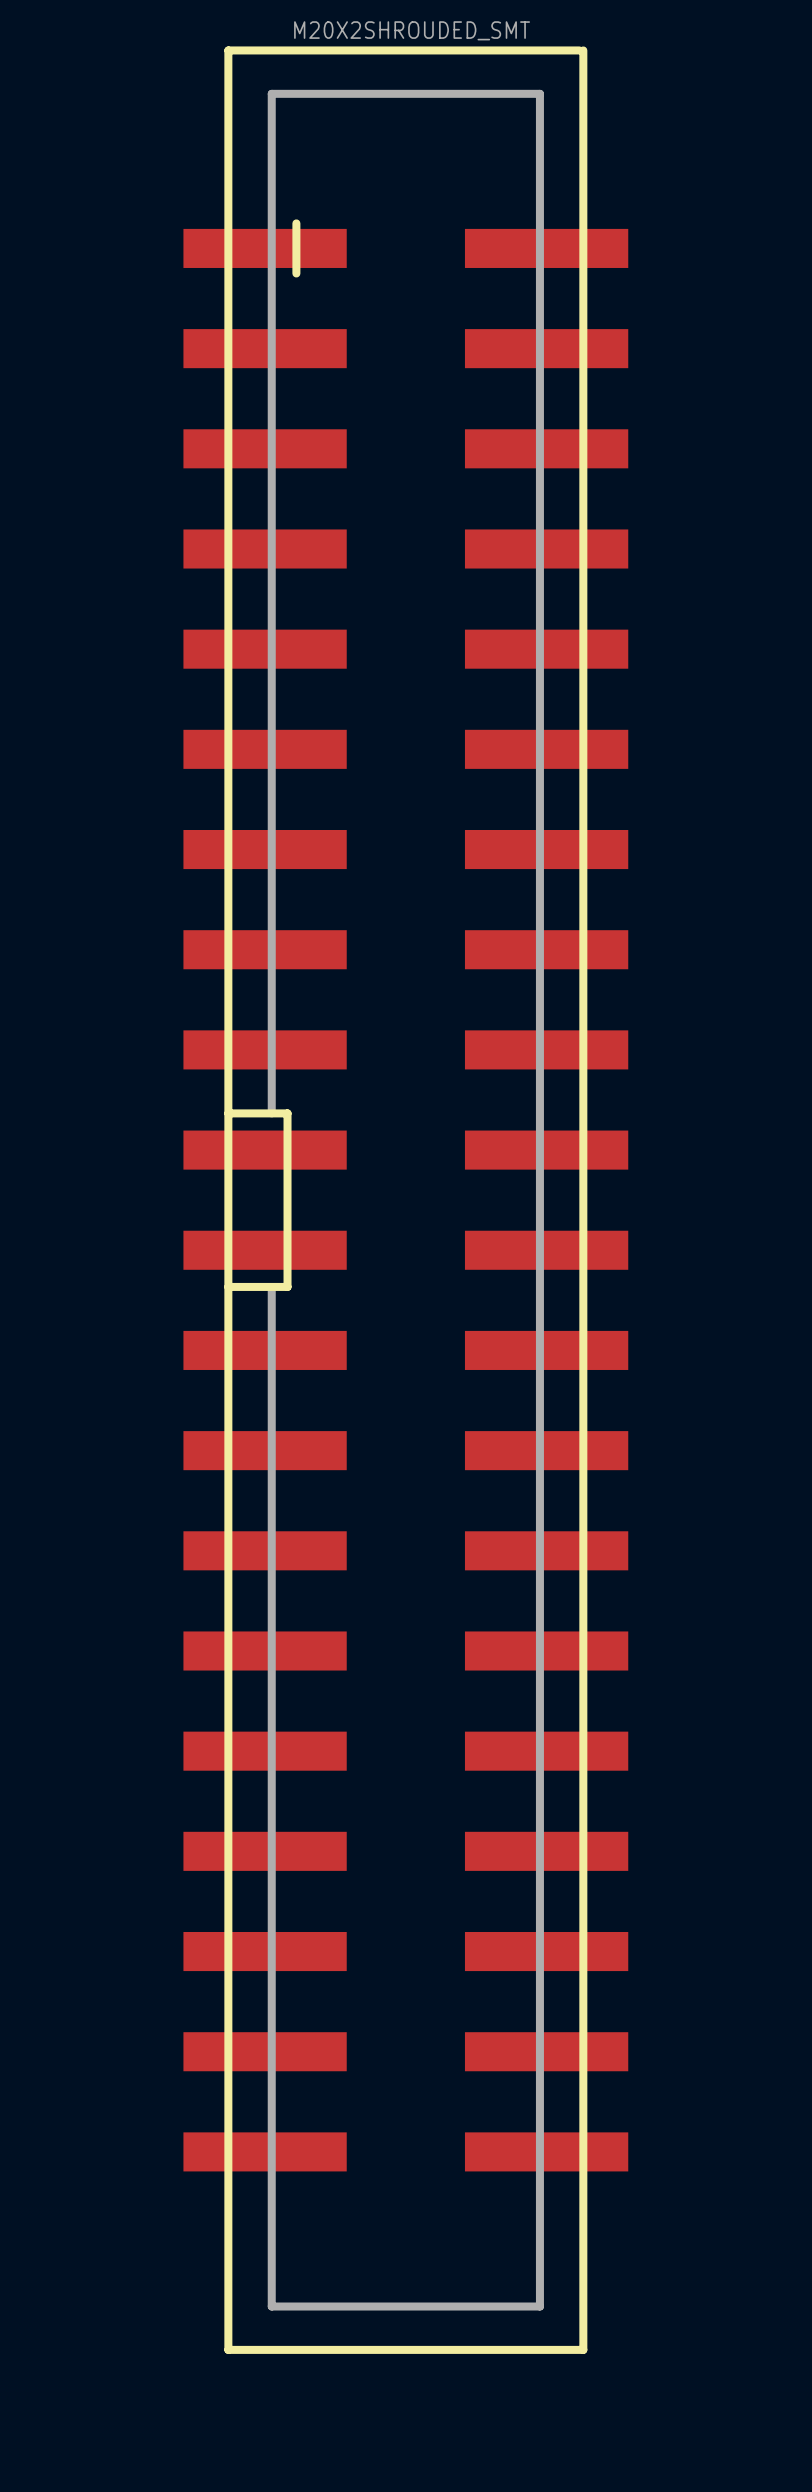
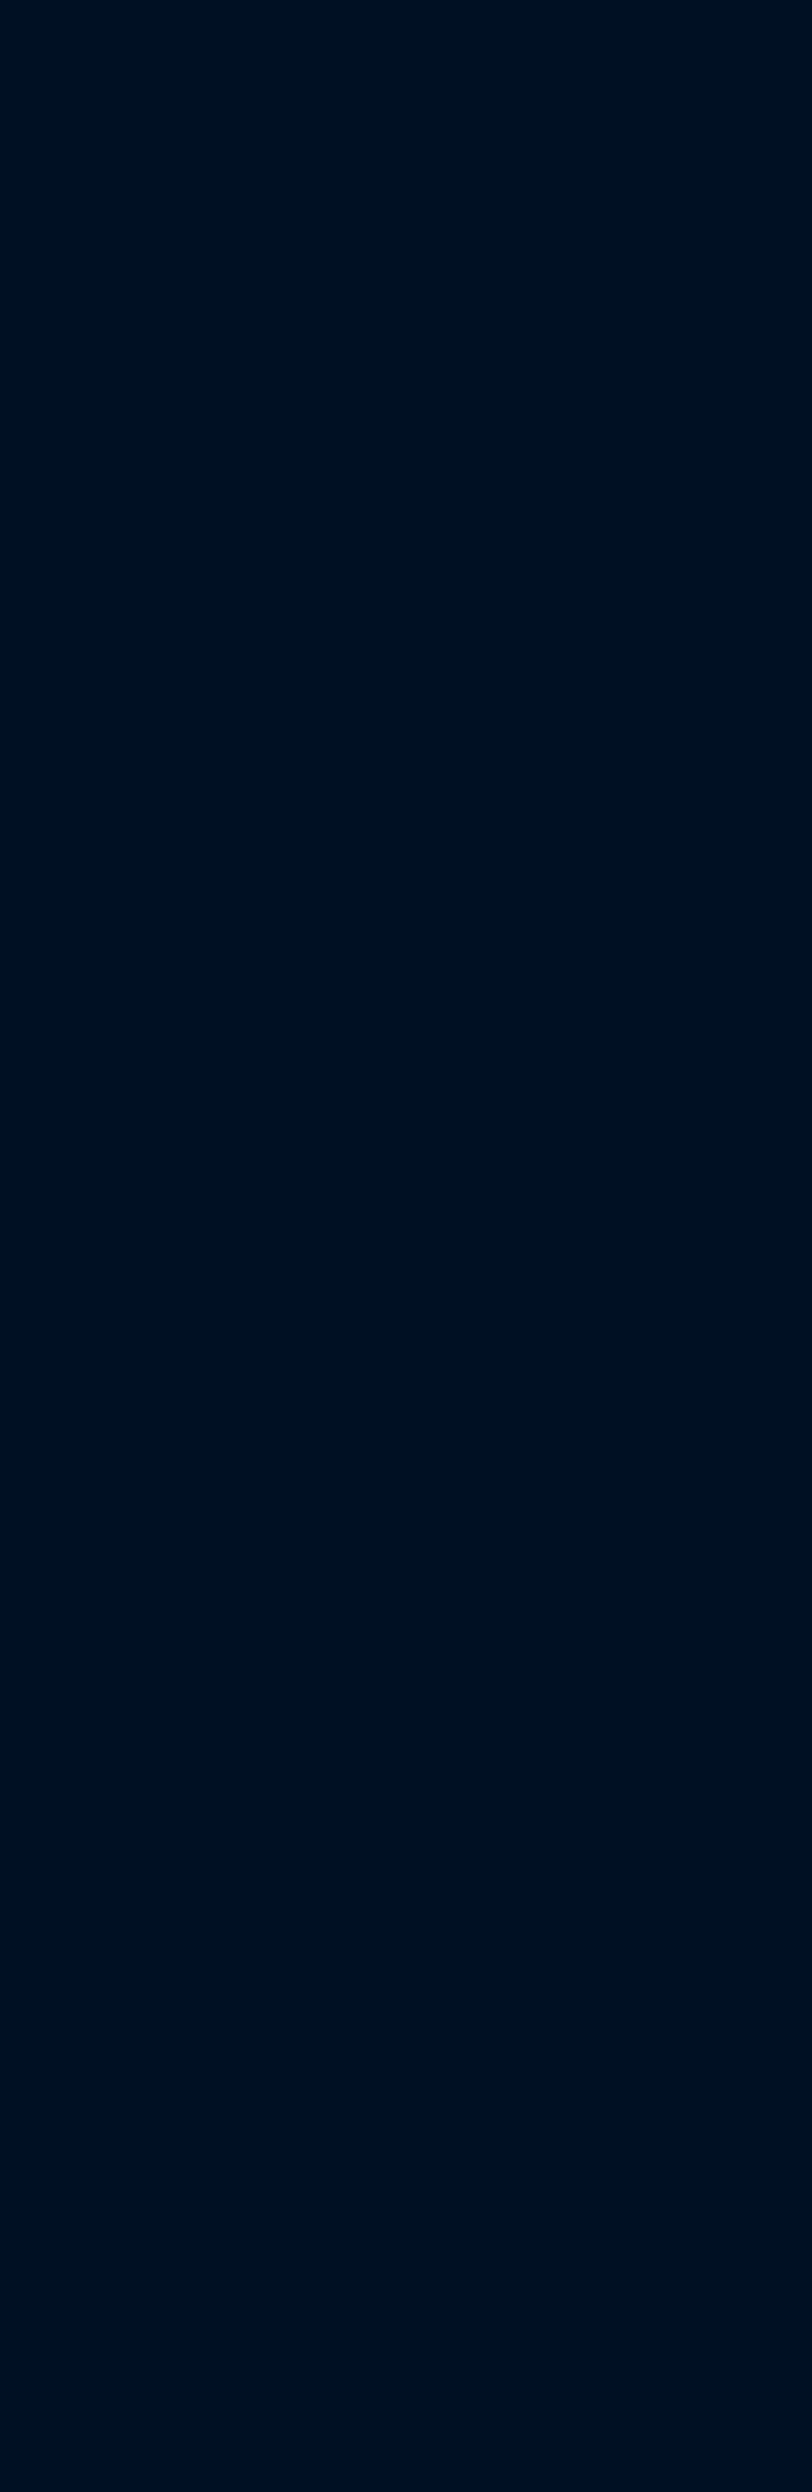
part: M20X2SHROUDED_SMT (405, 1200) -> none

